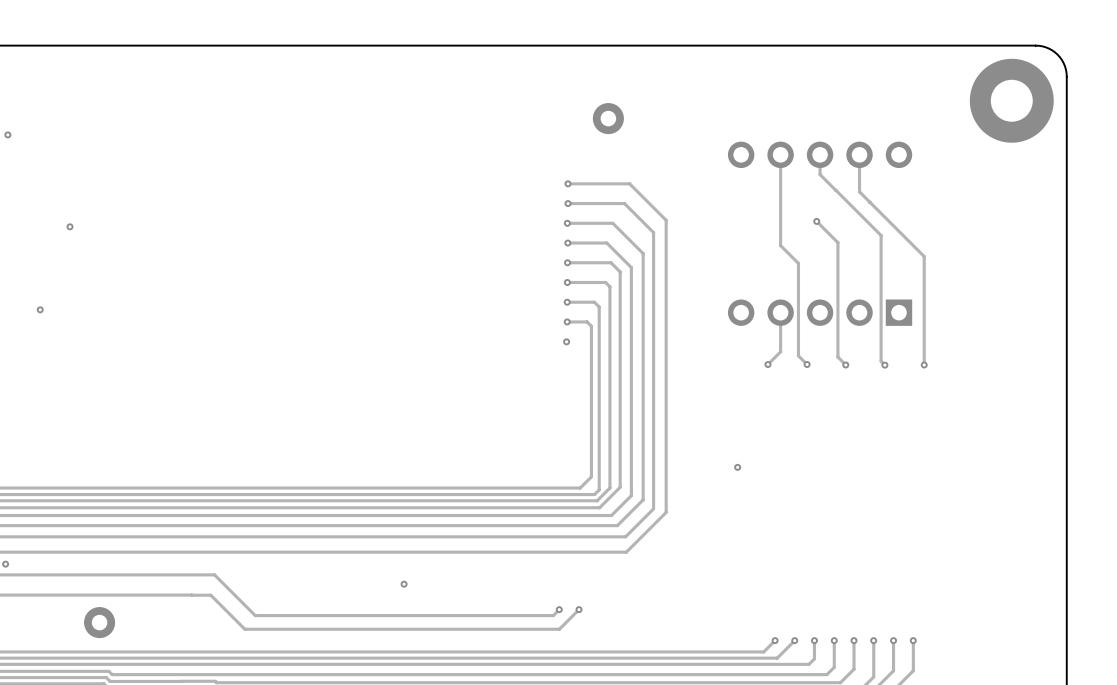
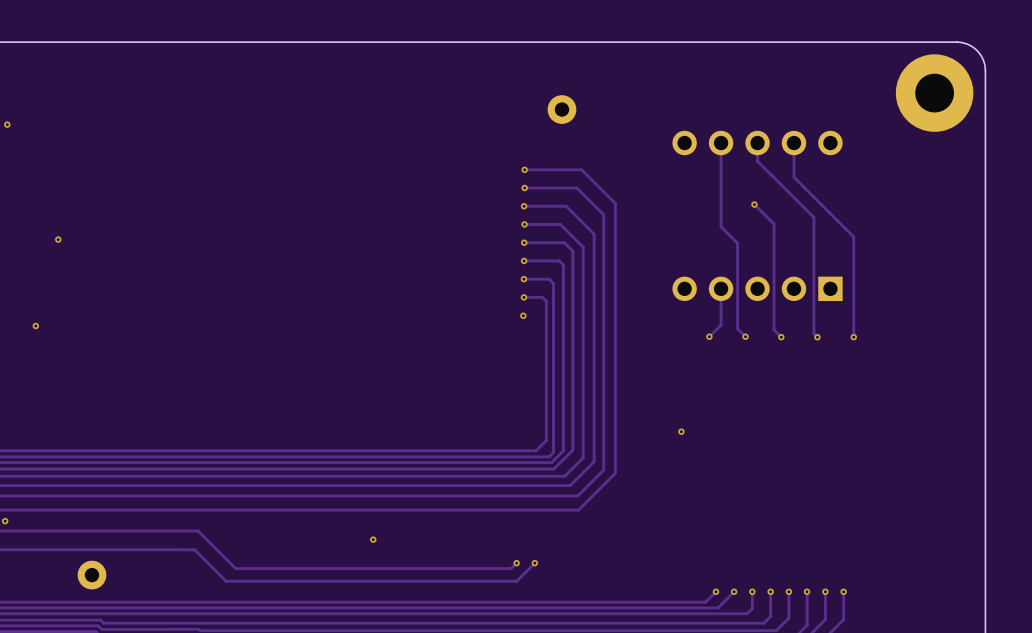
via: (69, 226) -> none
via: none -> (58, 239)
via: (40, 309) -> none
via: none -> (35, 326)

